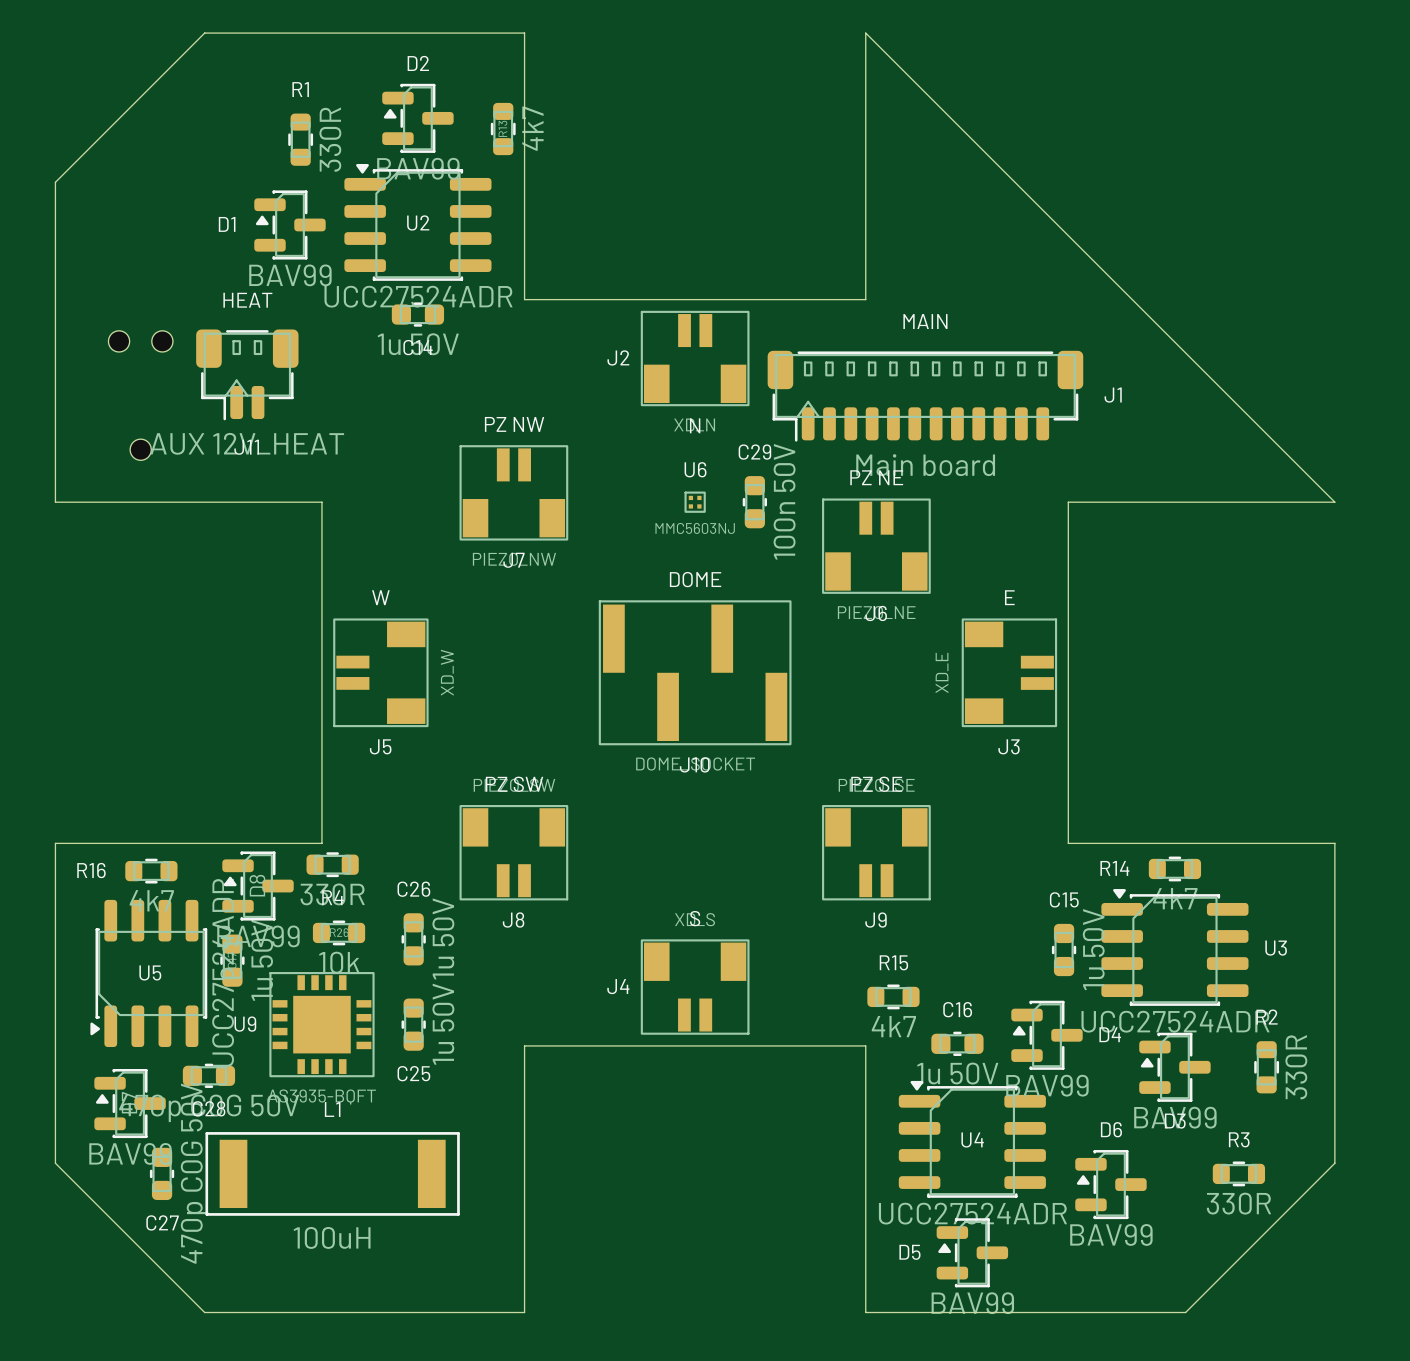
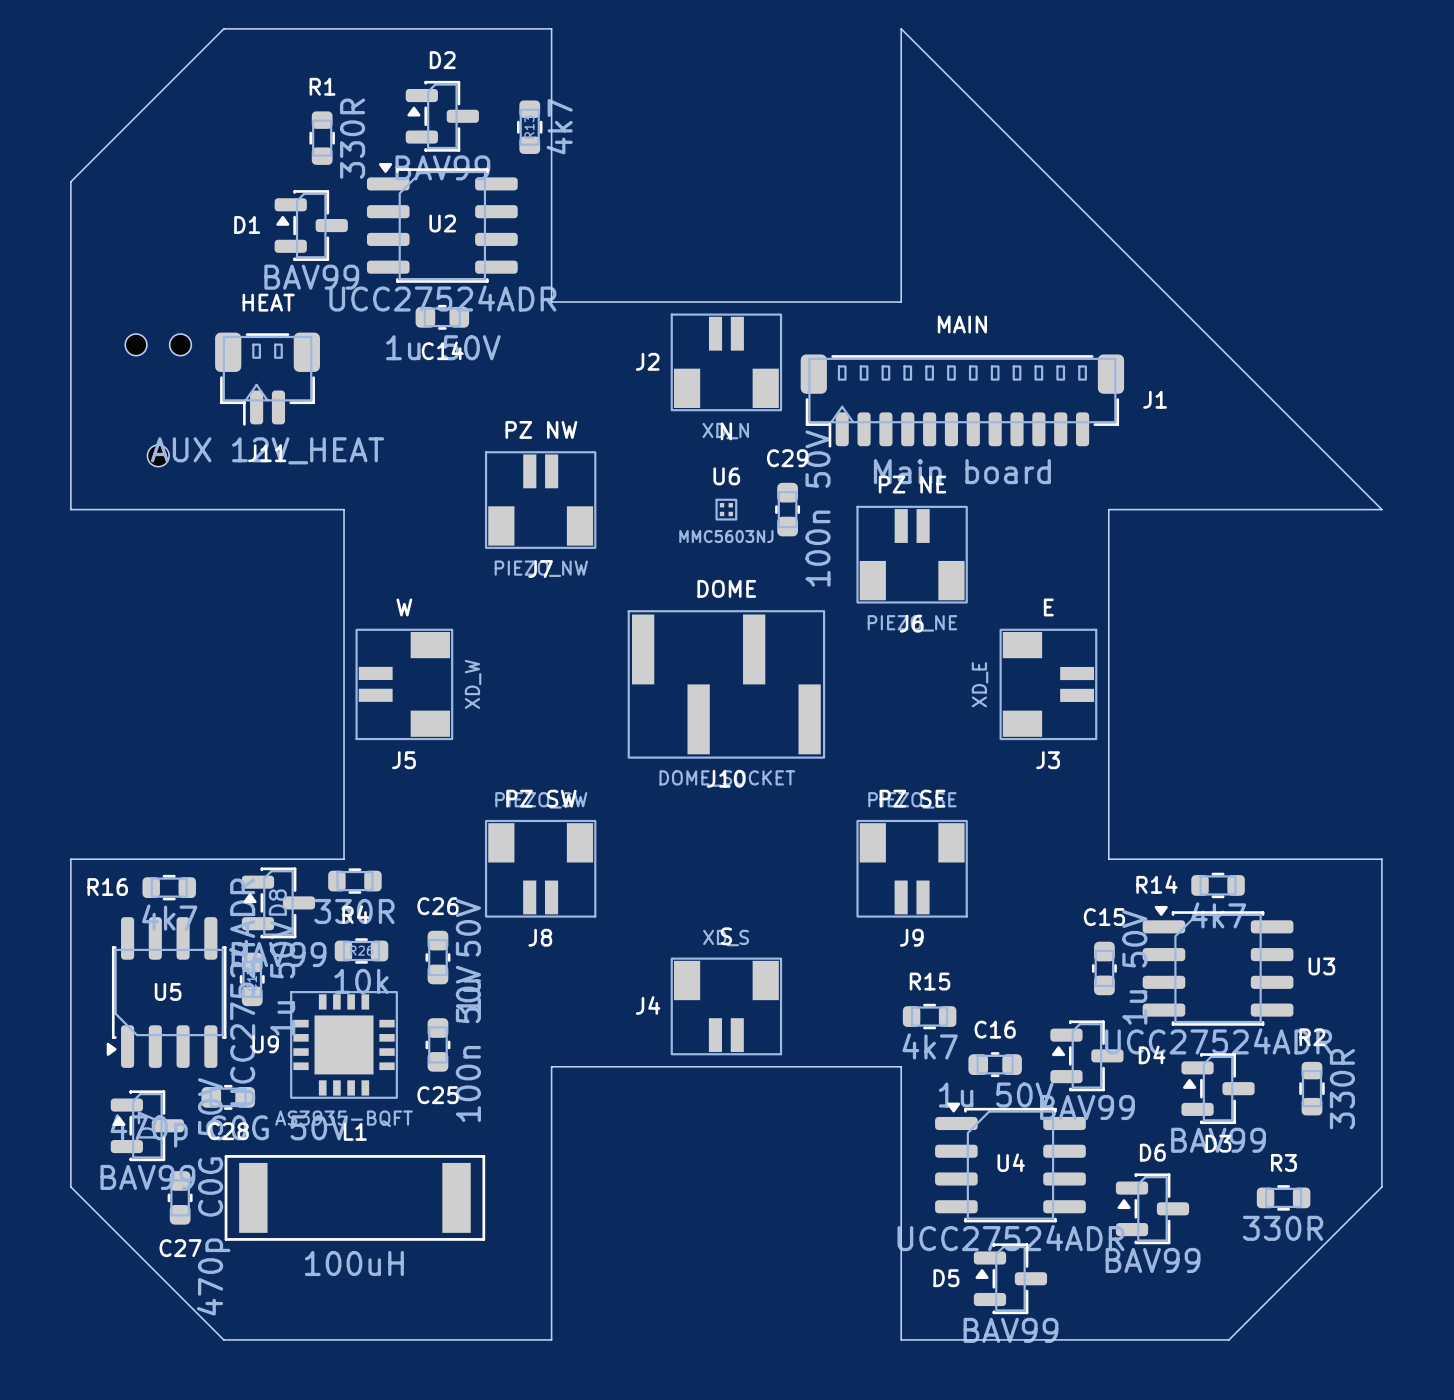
C25 value: 1u 50V (443, 1024) -> 100n 50V (468, 1043)

